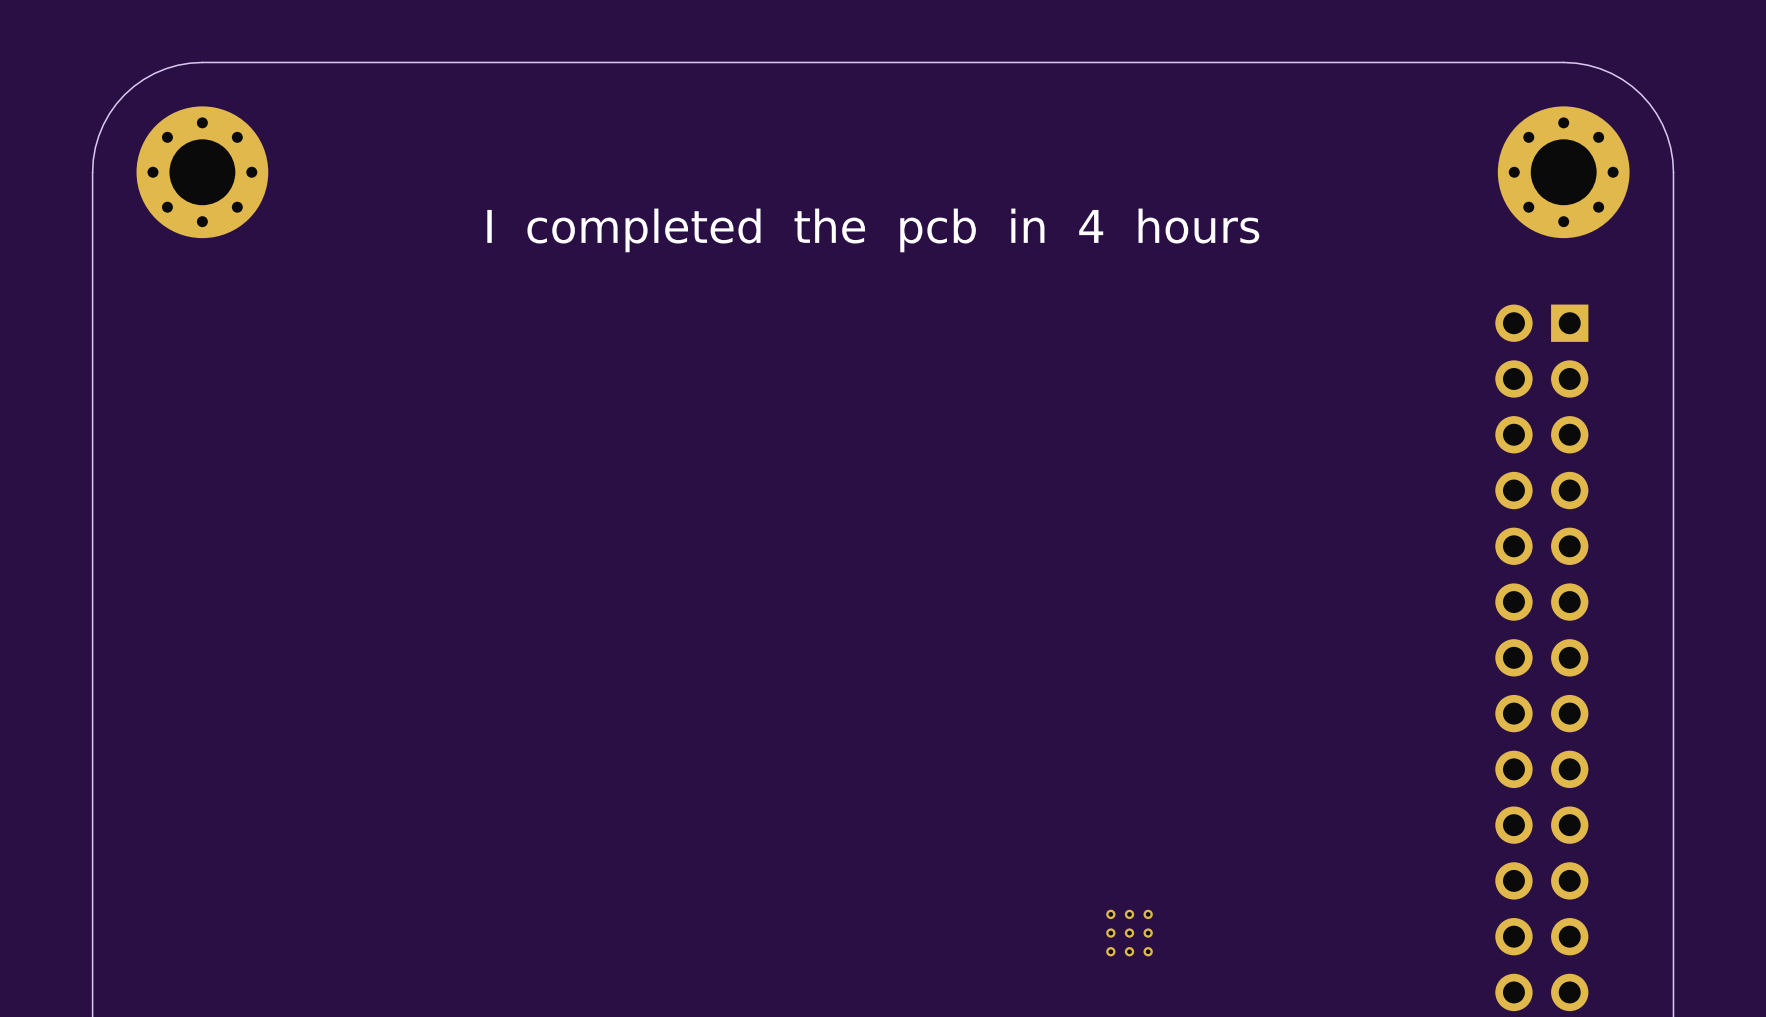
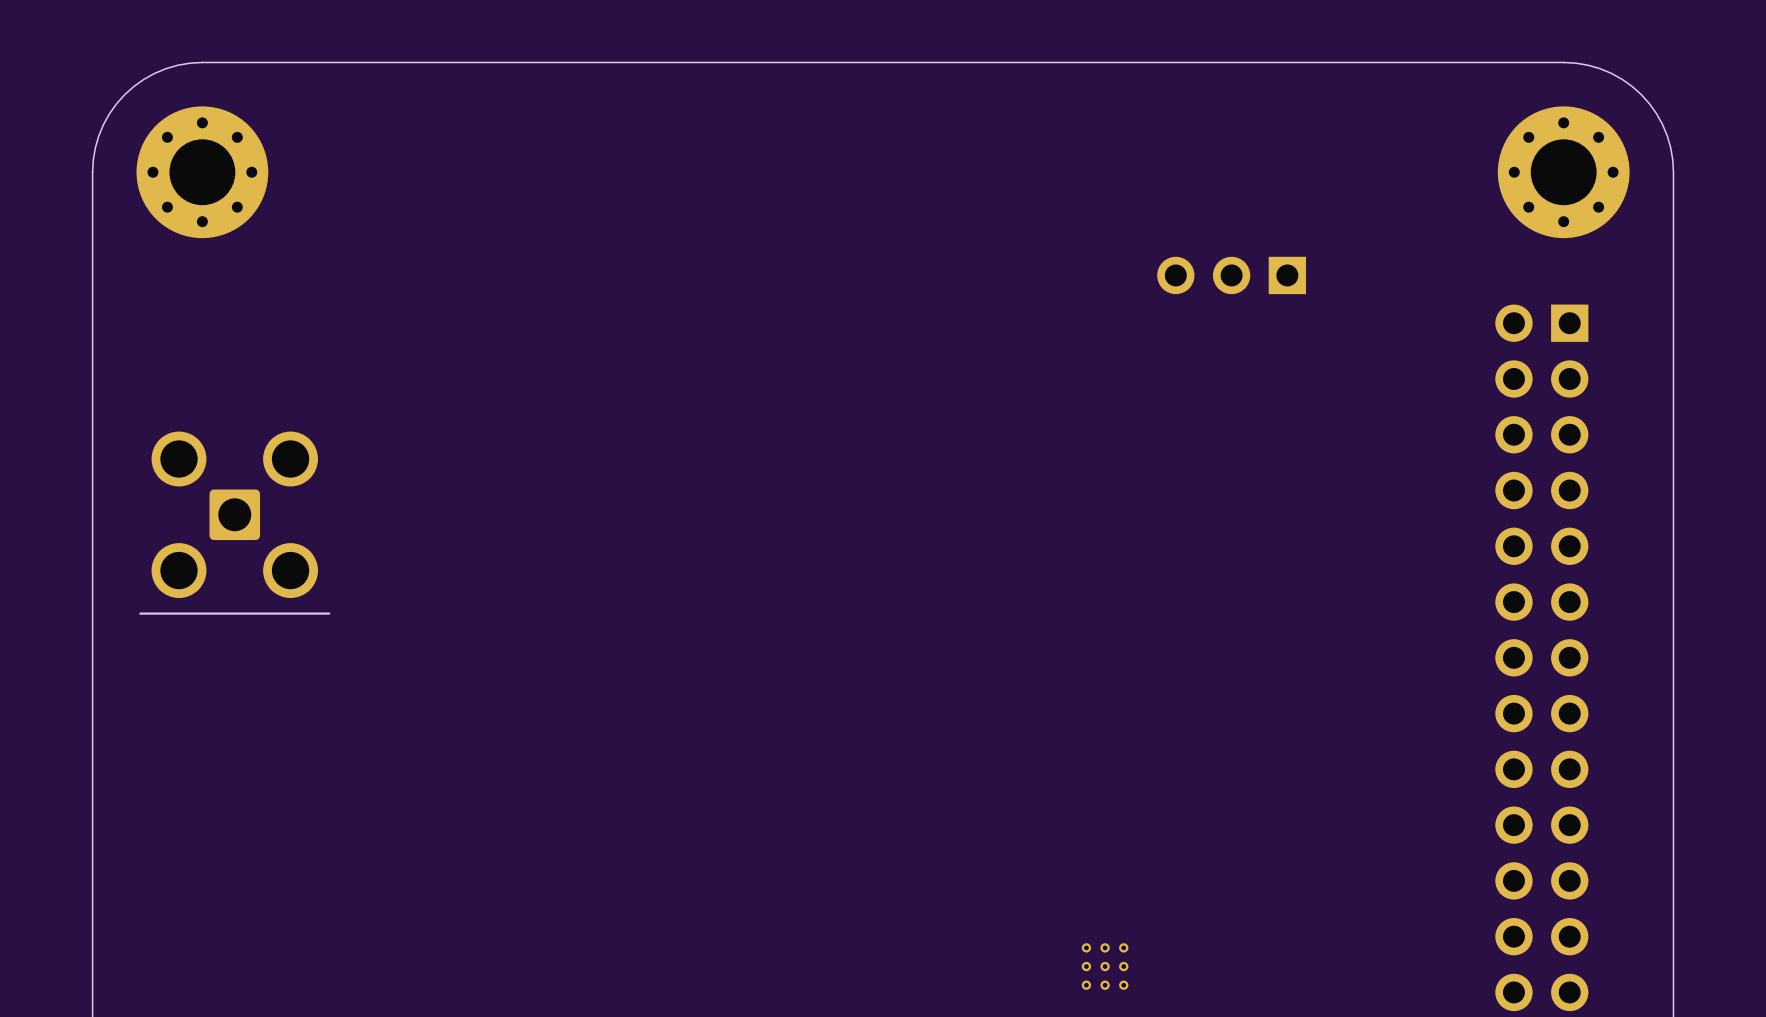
text: I completed the pcb in 4 hours (873, 230) -> none
part: none -> (1231, 275)
part: none -> (234, 523)
part position: (1129, 933) -> (1105, 966)

